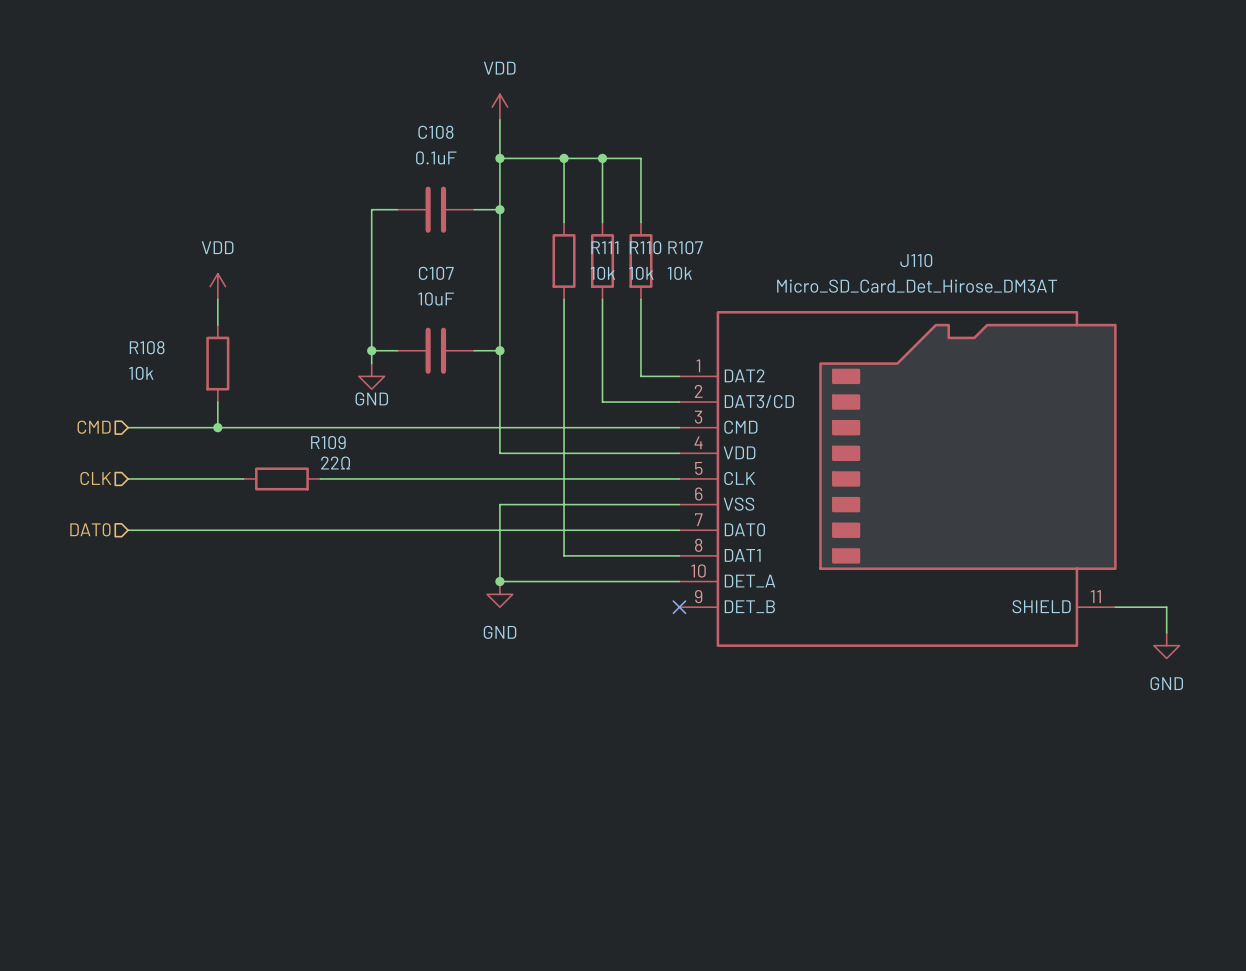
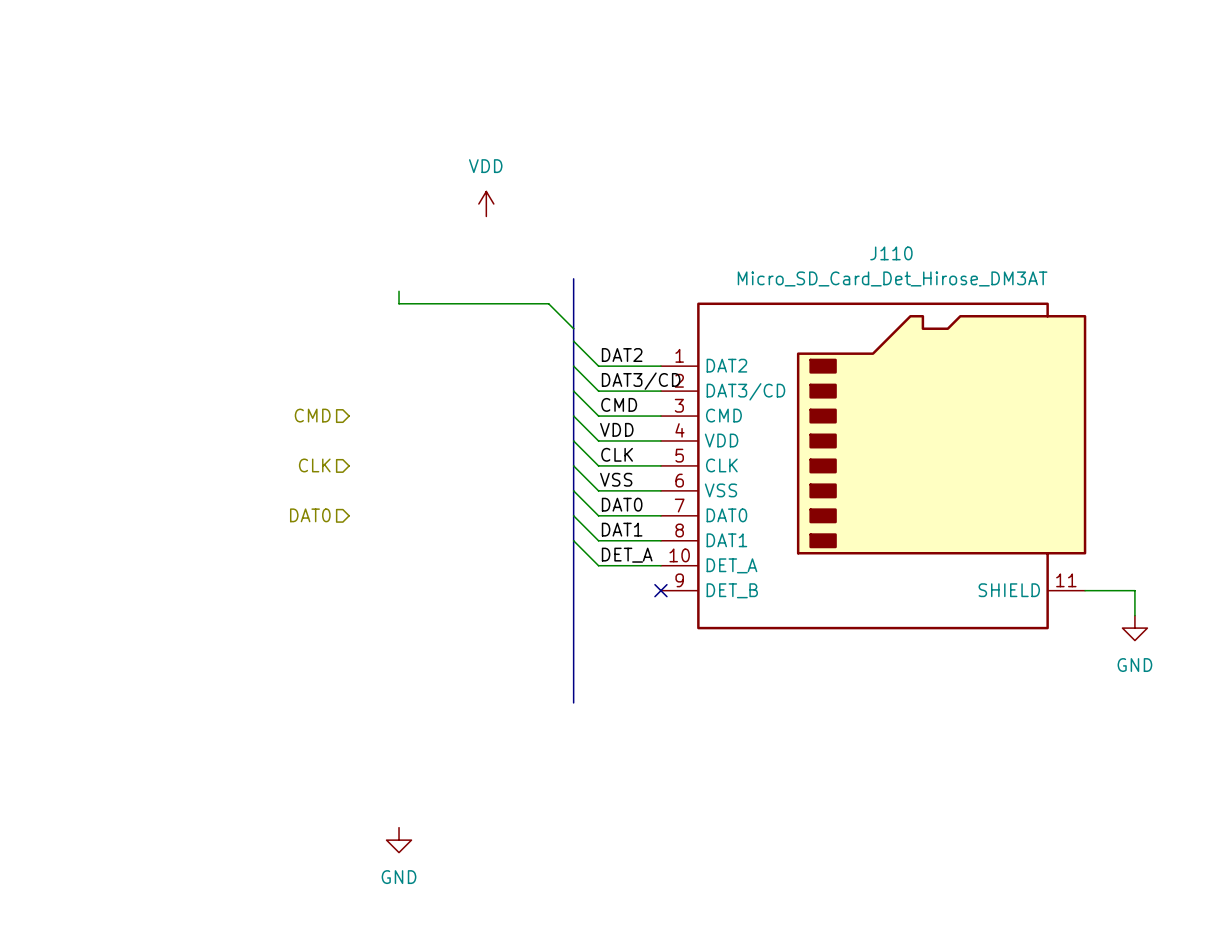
power symbol position: VDD (499, 107) -> VDD (486, 203)
wire: (499, 119) (499, 453) (615, 453) -> (573, 416) (598, 440)
wire: (499, 158) (640, 158) (640, 222) -> none
junction: (499, 158) -> none
wire: (564, 158) (564, 222) -> none
junction: (564, 158) -> none
wire: (602, 158) (602, 222) -> none
junction: (602, 158) -> none
wire: (397, 209) (371, 209) (371, 363) -> none
C108: 0.1uF (435, 209) -> none
wire: (474, 209) (499, 209) -> none
junction: (499, 209) -> none
R111: 10k (564, 260) -> none
R110: 10k (602, 260) -> none
R107: 10k (640, 260) -> none
power symbol: VDD (217, 286) -> none
bus: none -> (573, 278) (573, 702)
wire: (217, 299) (217, 325) -> none
wire: none -> (399, 291) (399, 303) (548, 303) (573, 328)
wire: (564, 299) (564, 555) (615, 555) -> (573, 515) (598, 540)
wire: (602, 299) (602, 402) (615, 402) -> (573, 366) (598, 391)
wire: (640, 299) (640, 376) -> (573, 341) (598, 366) (623, 366)
wire: (371, 350) (397, 350) -> none
junction: (371, 350) -> none
C107: 10uF (435, 350) -> none
wire: (474, 350) (499, 350) -> none
junction: (499, 350) -> none
R108: 10k (217, 363) -> none
label: none -> DAT2 (622, 355)
power symbol: GND (371, 376) -> none
label: none -> DAT3/CD (641, 381)
wire: (217, 402) (217, 427) -> none
label: none -> CMD (619, 404)
hierarchical label position: CMD (94, 427) -> CMD (312, 415)
wire: (128, 427) (615, 427) -> (573, 391) (598, 416)
junction: (217, 427) -> none
label: none -> VDD (616, 429)
label: none -> CLK (617, 454)
hierarchical label position: CLK (95, 478) -> CLK (314, 465)
wire: (128, 478) (243, 478) -> none
R109: 22Ω (281, 478) -> none
wire: (320, 478) (615, 478) -> (573, 440) (598, 465)
wire: none -> (573, 465) (598, 490)
label: none -> VSS (616, 479)
wire: (615, 504) (499, 504) (499, 581) (615, 581) -> (573, 540) (598, 565)
label: none -> DAT0 (622, 504)
hierarchical label position: DAT0 (90, 529) -> DAT0 (310, 515)
wire: (128, 530) (615, 530) -> (573, 490) (598, 515)
label: none -> DAT1 (622, 529)
label: none -> DET_A (627, 555)
junction: (499, 581) -> none
power symbol: GND (499, 594) -> none
power symbol: none -> GND (399, 840)

